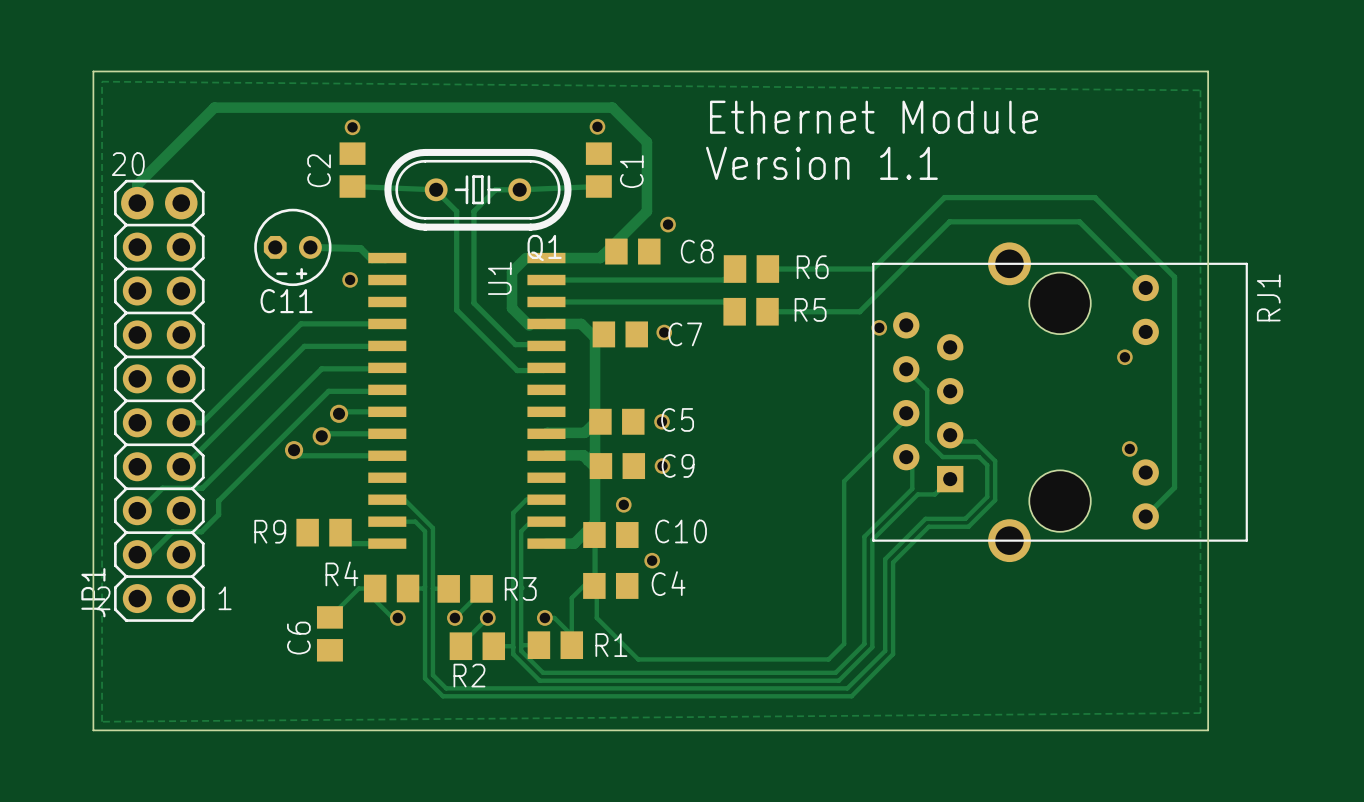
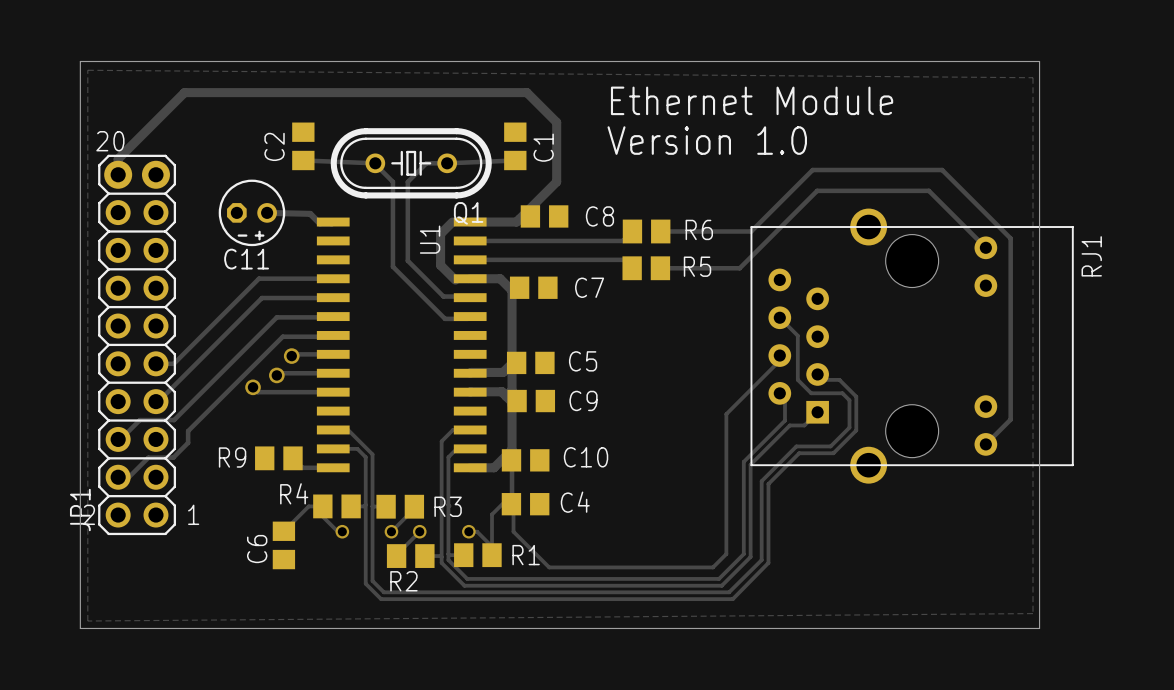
via: (597, 126) -> none
via: (352, 127) -> none
text: Version 1.1 (821, 163) -> Version 1.0 (707, 140)
via: (668, 224) -> none
via: (350, 279) -> none
via: (879, 327) -> none
via: (664, 332) -> none
via: (1124, 357) -> none
via: (662, 421) -> none
via: (1129, 448) -> none
via: (662, 466) -> none
via: (623, 504) -> none
via: (652, 560) -> none

